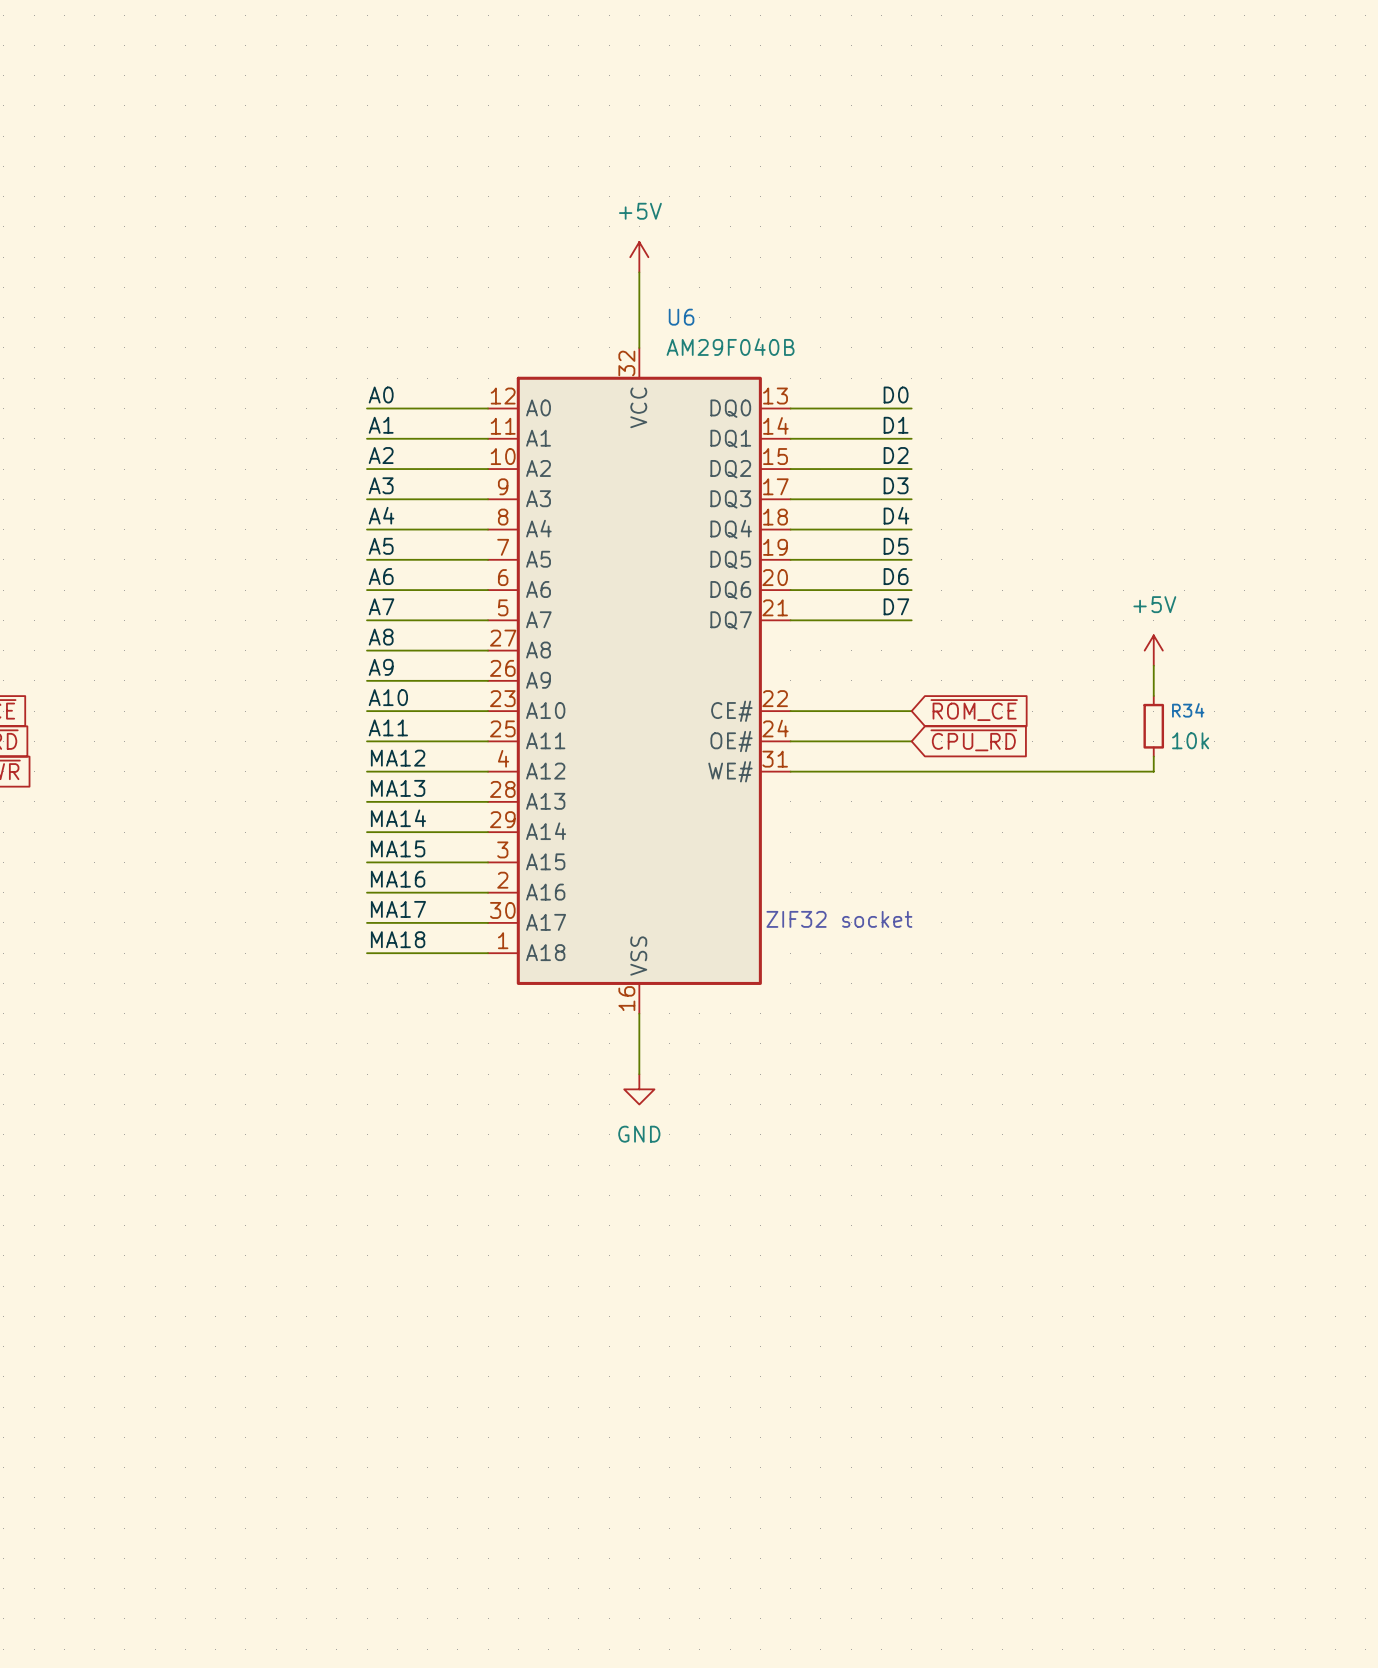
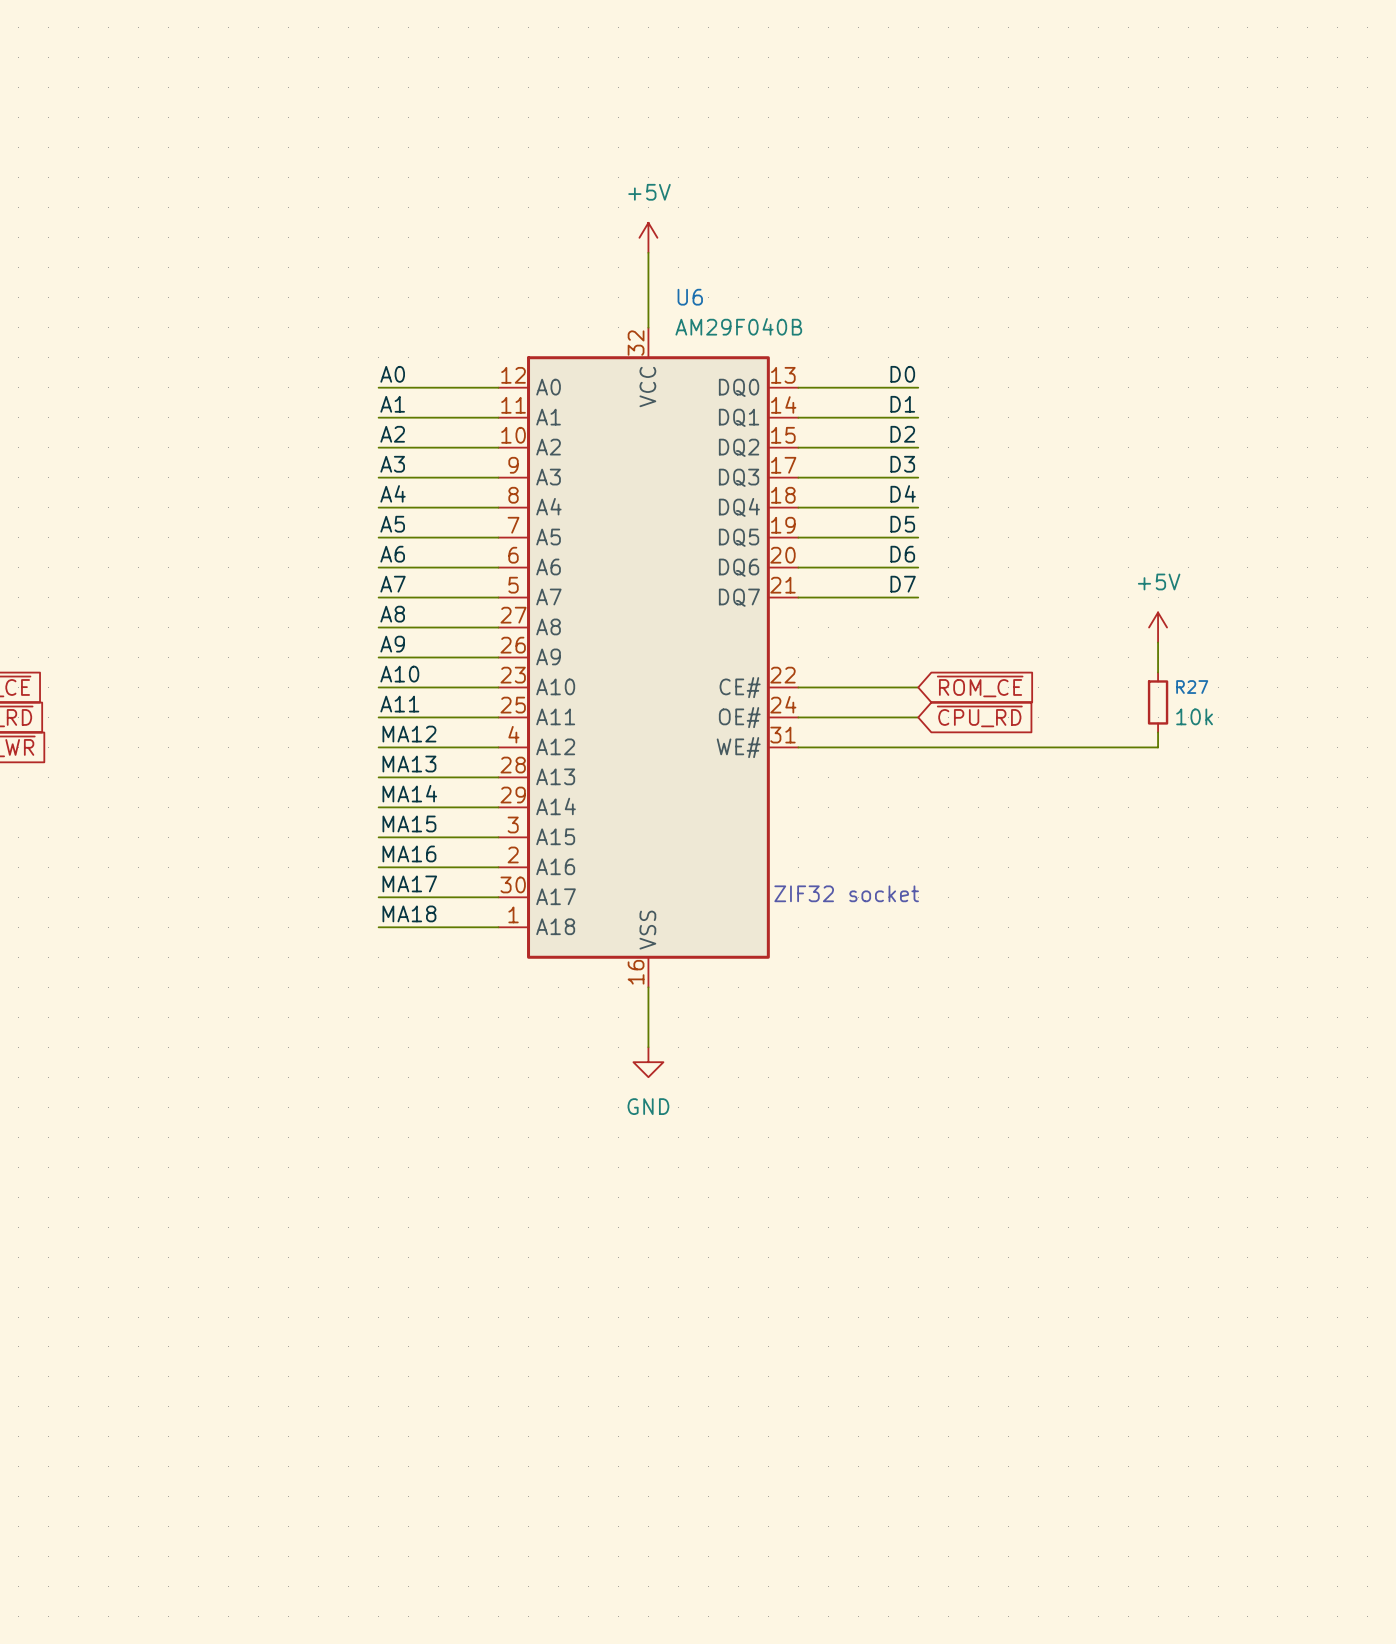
R34 name: R34 (1188, 710) -> R27 (1192, 687)

